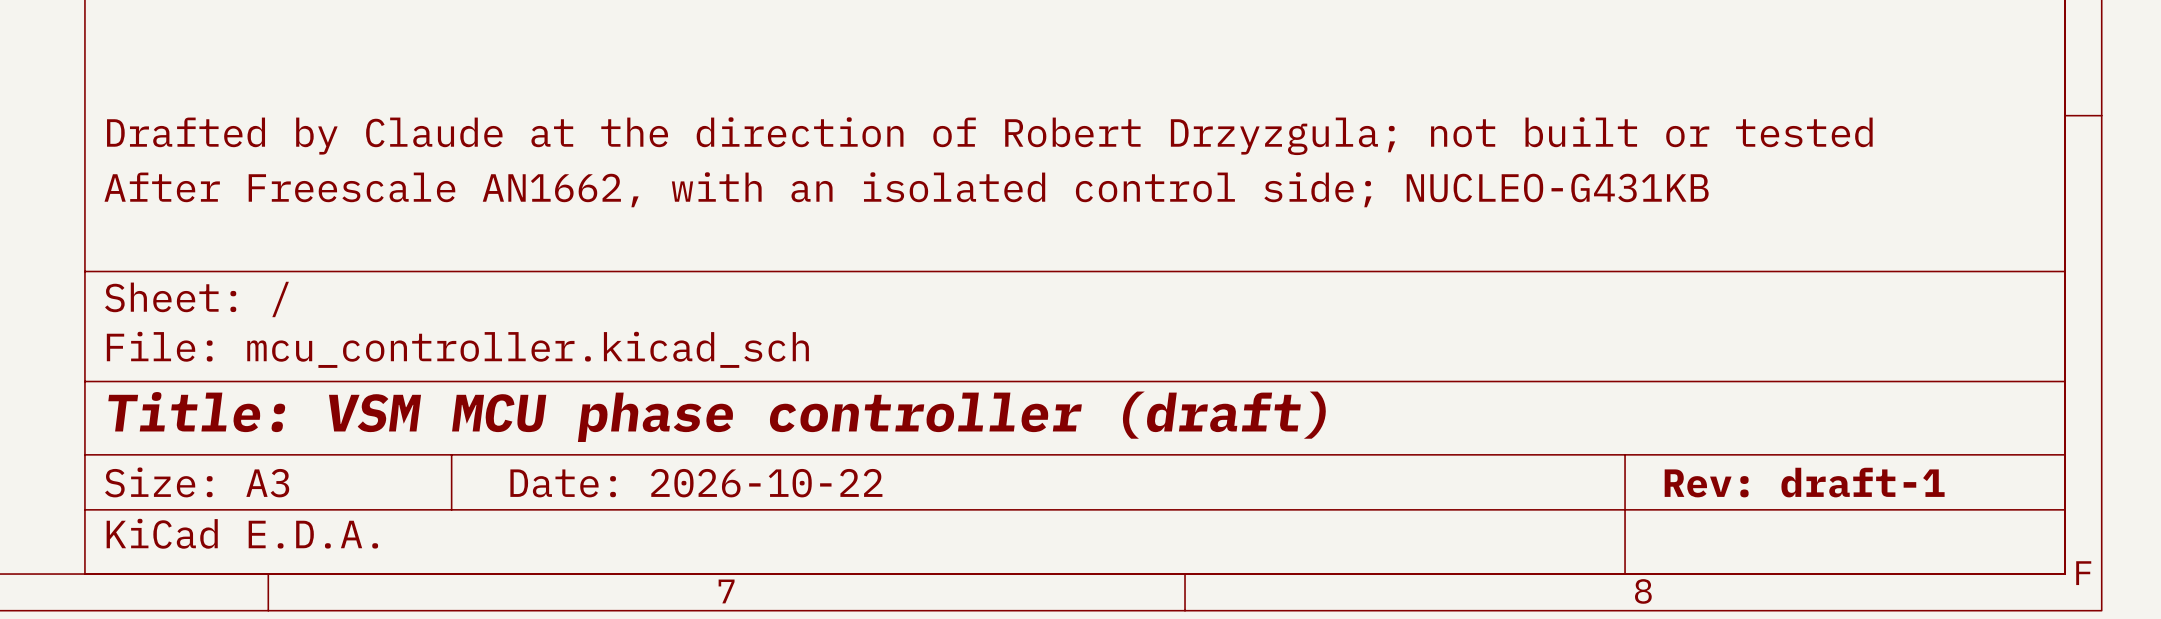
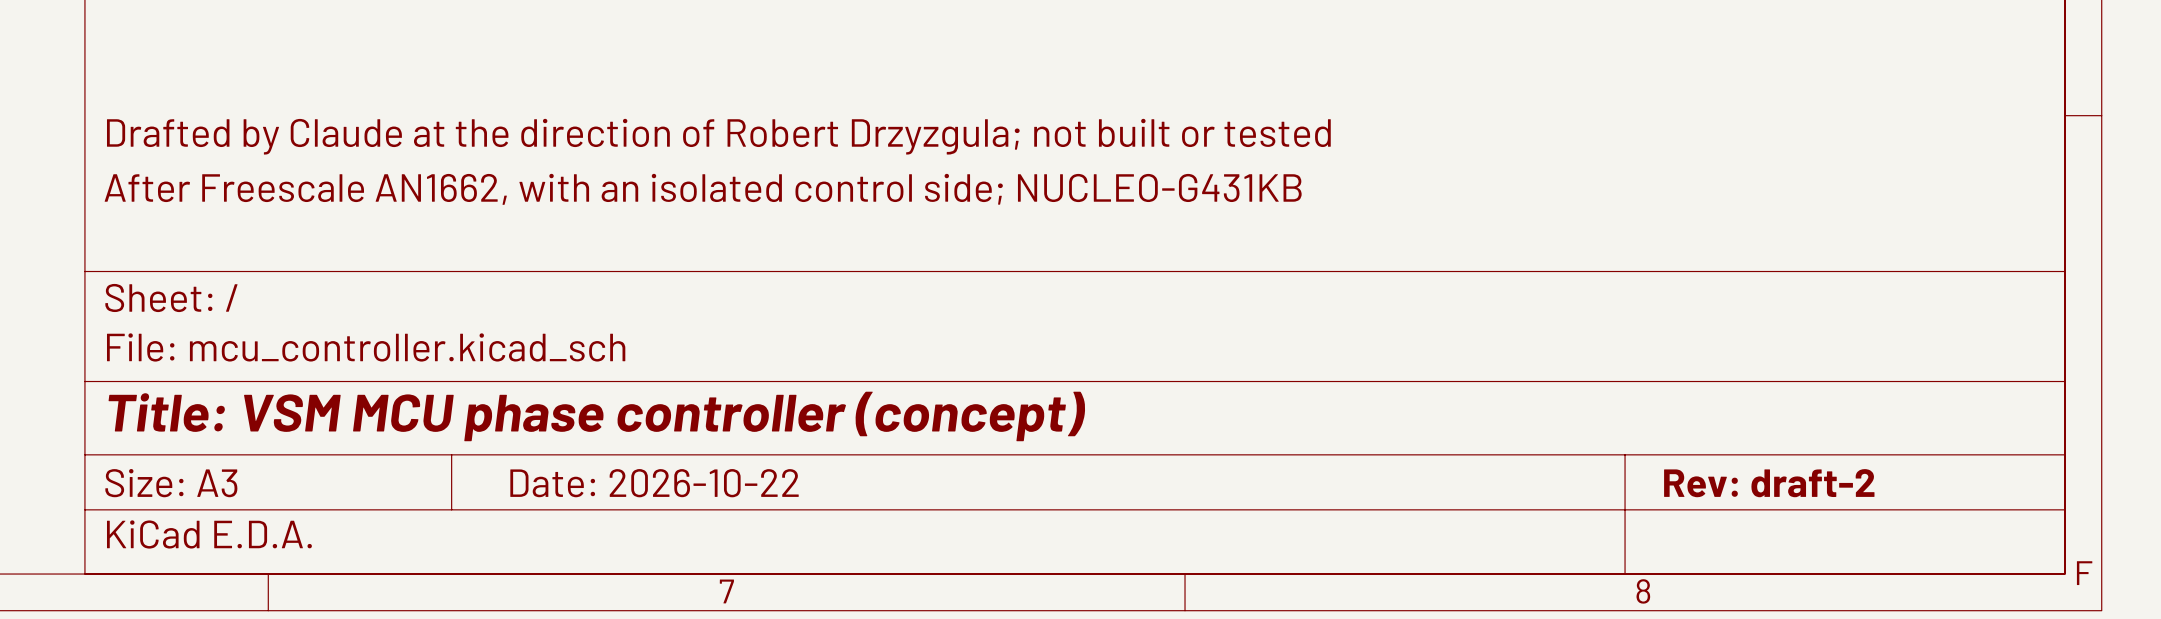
title block: Title: VSM MCU phase controller (draft) (717, 416) -> Title: VSM MCU phase controller (concept) (597, 416)
title block: Rev: draft-1 (1804, 482) -> Rev: draft-2 (1769, 483)

